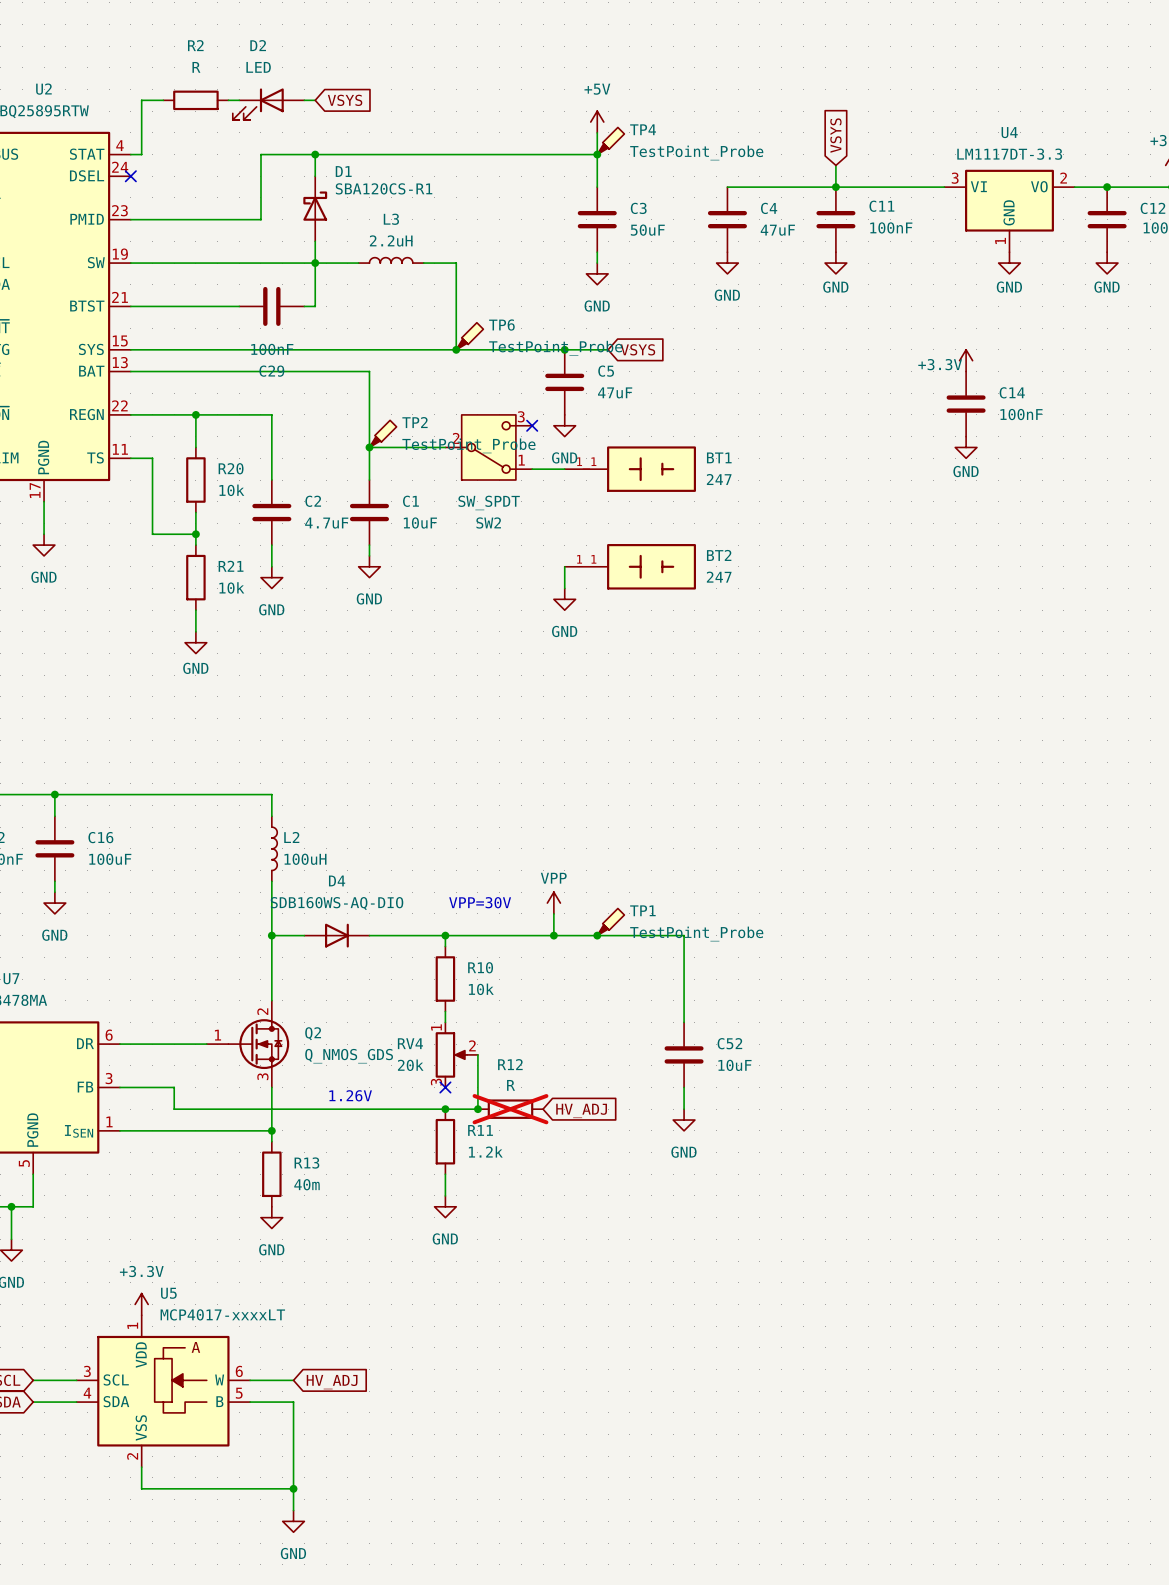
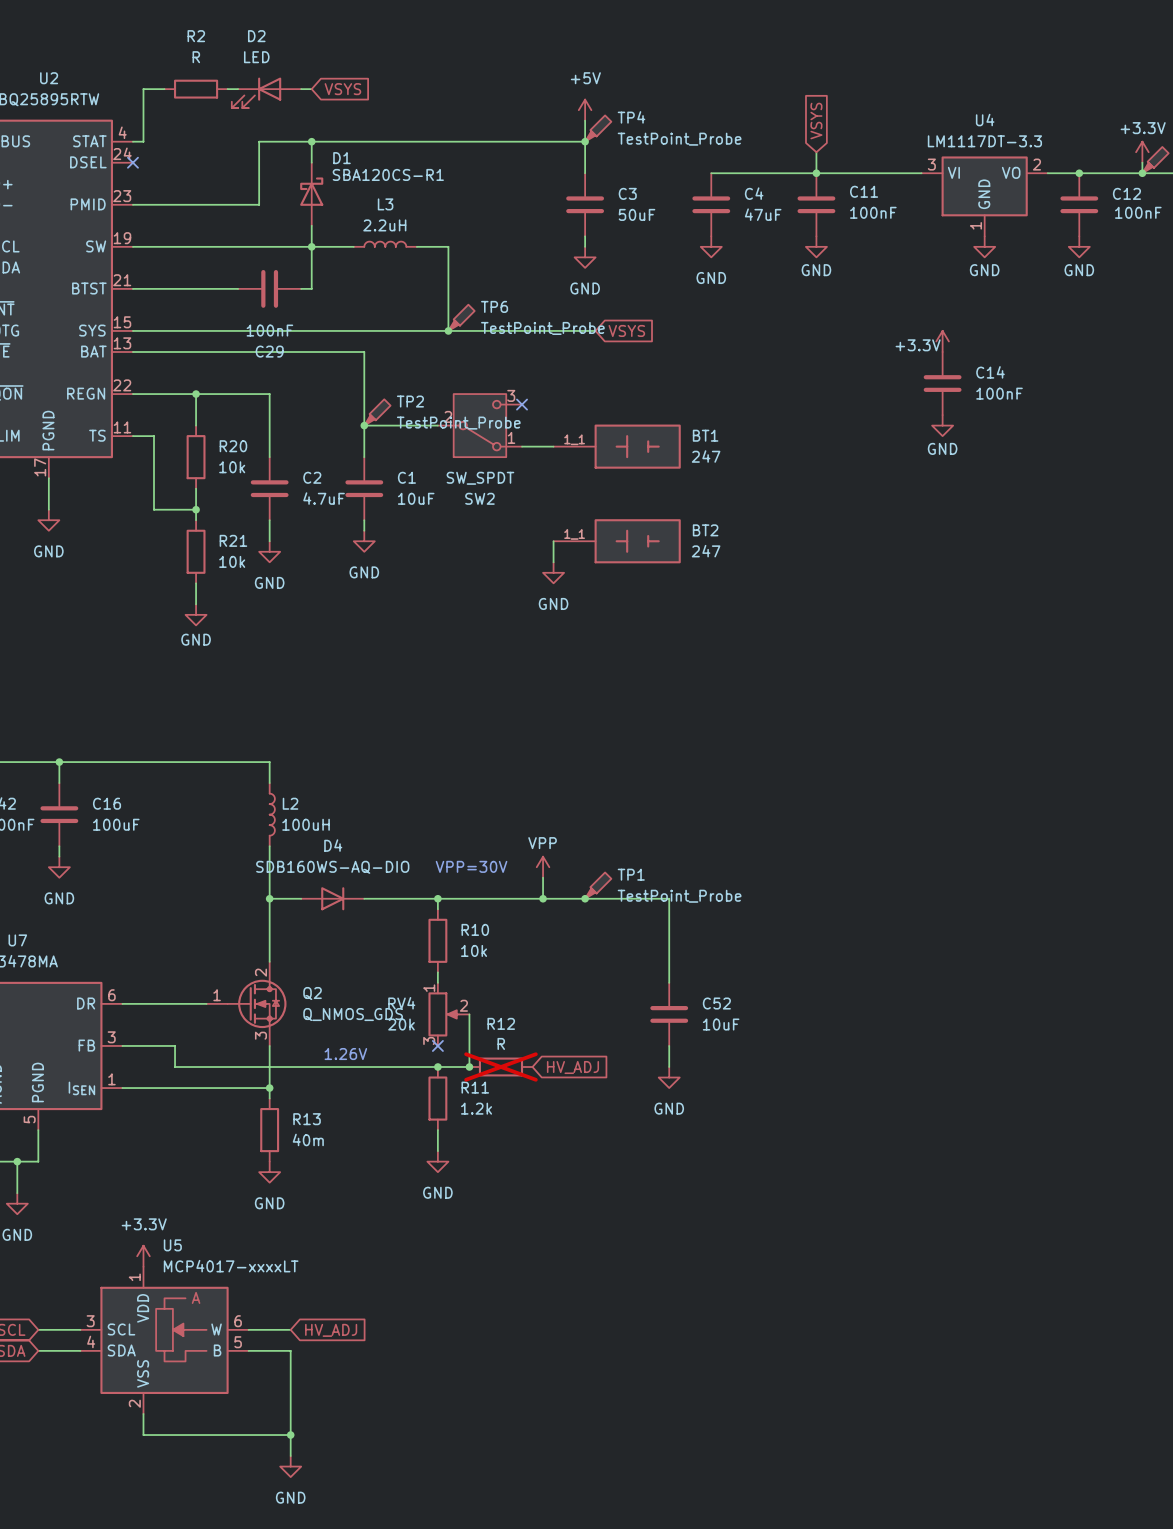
junction: (564, 349) -> none
C5: 47uF (564, 382) -> none
power symbol: GND (564, 425) -> none

